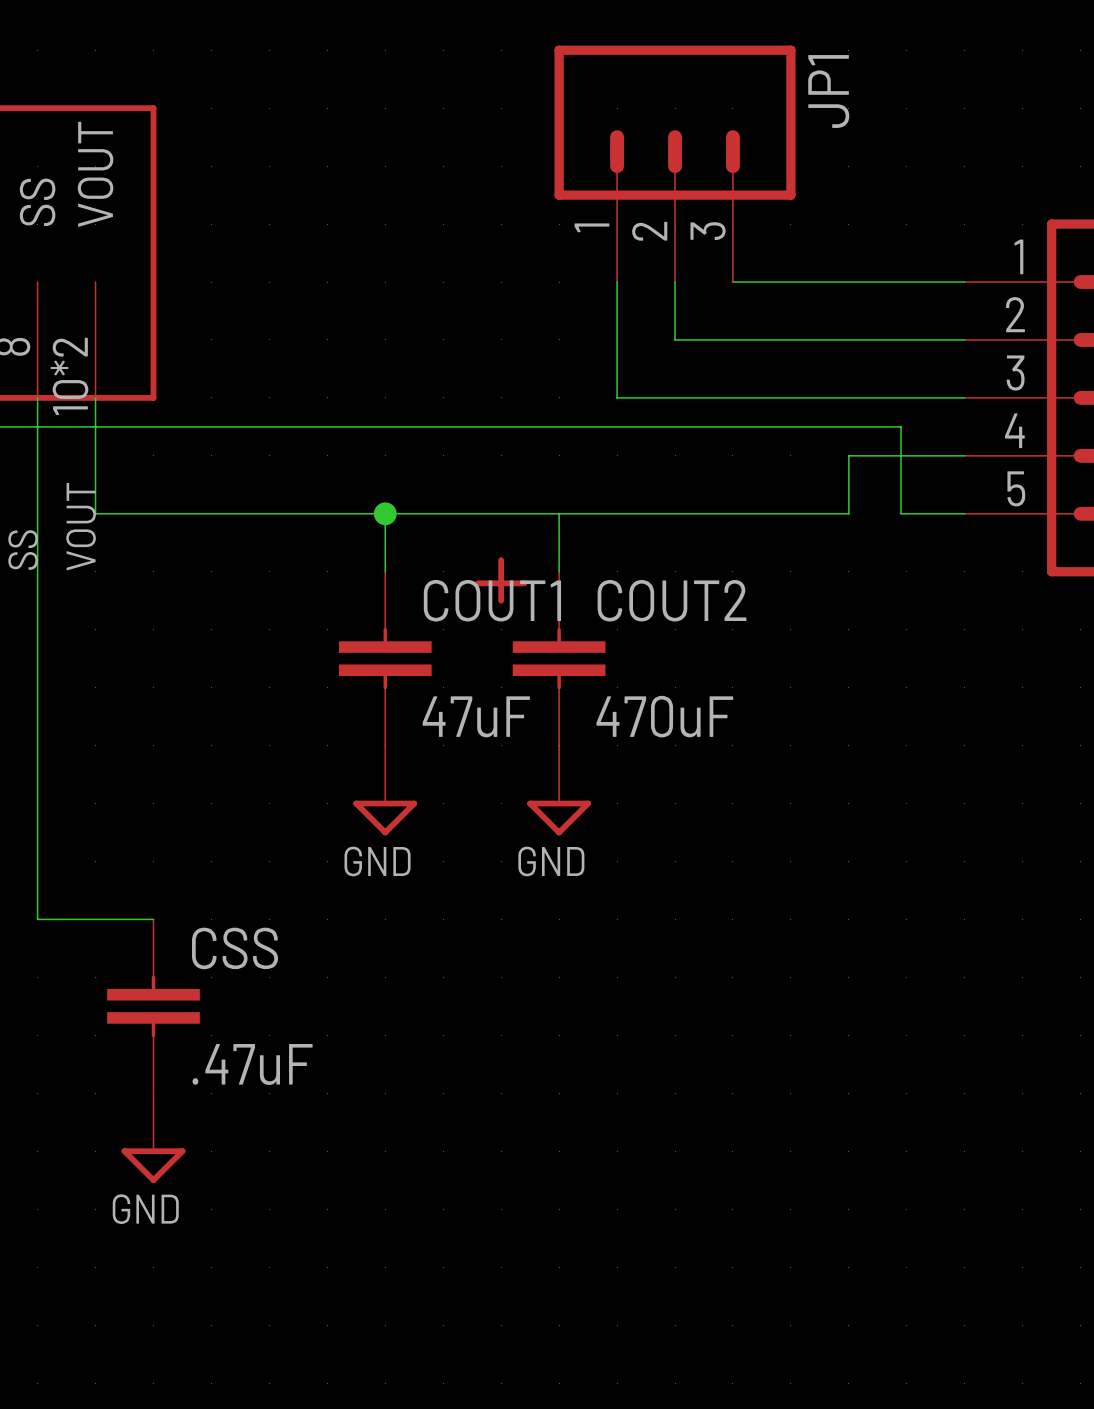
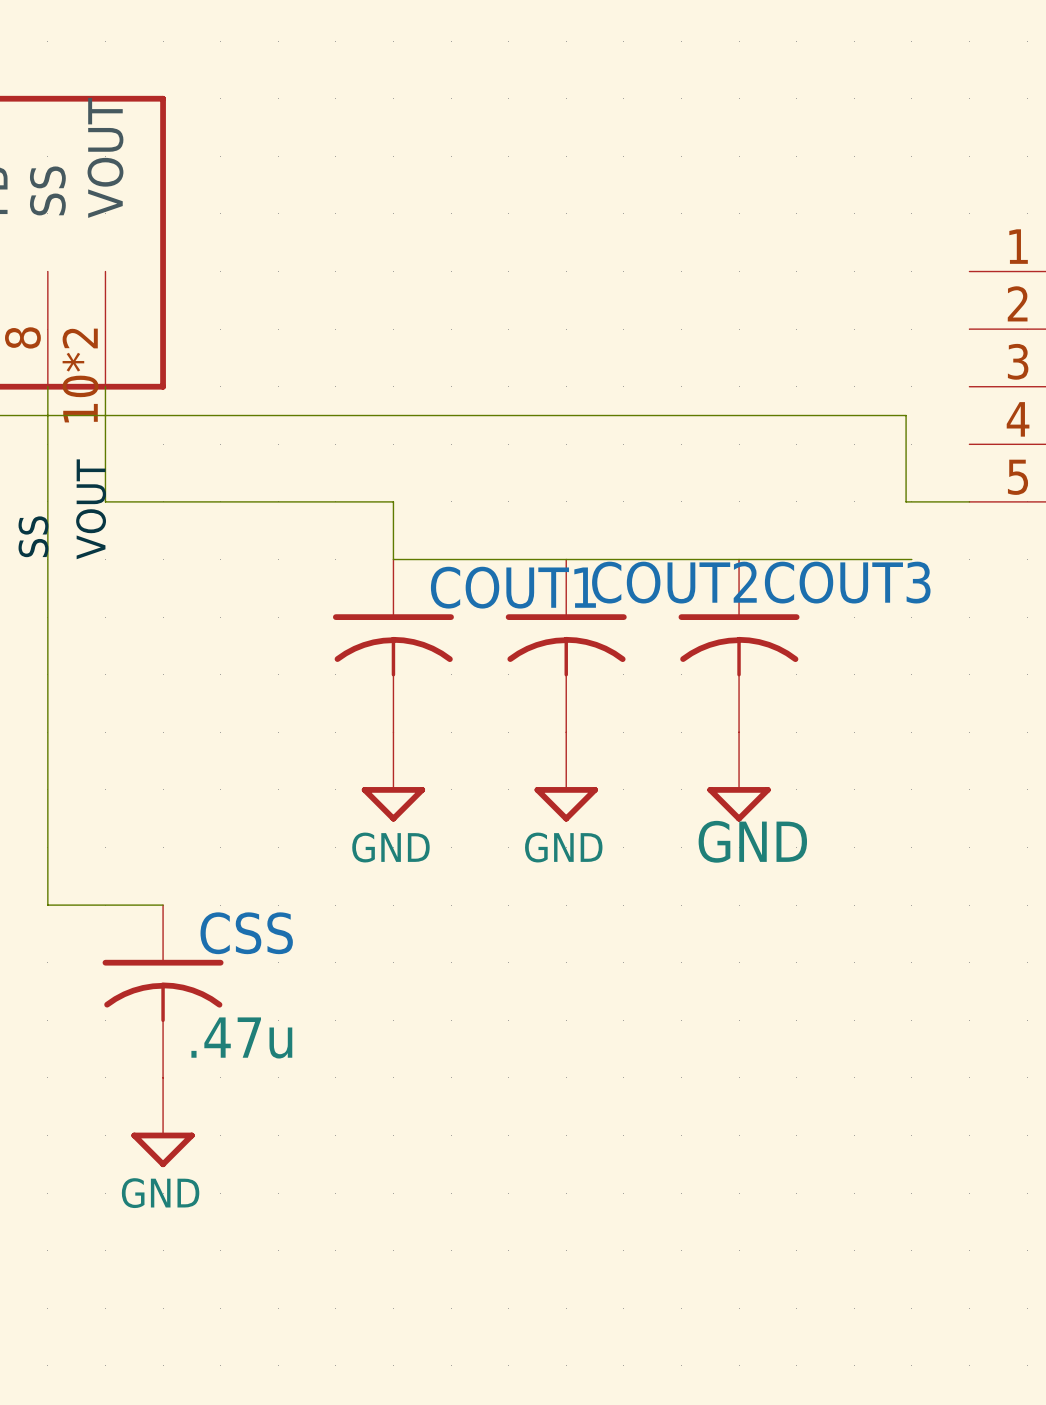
JP1: (675, 163) -> none
wire: (617, 282) (617, 397) (964, 397) -> none
wire: (675, 282) (675, 339) (964, 339) -> none
wire: (732, 282) (964, 282) -> none
wire: (964, 455) (848, 455) (848, 513) (385, 513) -> none
junction: (385, 513) -> none
wire: (559, 513) (559, 571) -> none
COUT2 symbol: [475, 557, 606, 746] -> [505, 559, 627, 733]
COUT1 symbol: [338, 571, 432, 746] -> [332, 559, 454, 733]
wire: none -> (393, 559) (911, 559)
COUT3: none -> (739, 645)
COUT1 value: 47uF (476, 716) -> none
COUT2 value: 470uF (664, 716) -> none
power symbol: none -> GND (739, 776)
CSS symbol: [107, 919, 200, 1094] -> [102, 905, 224, 1078]
CSS value: .47uF (252, 1064) -> .47u (241, 1037)

